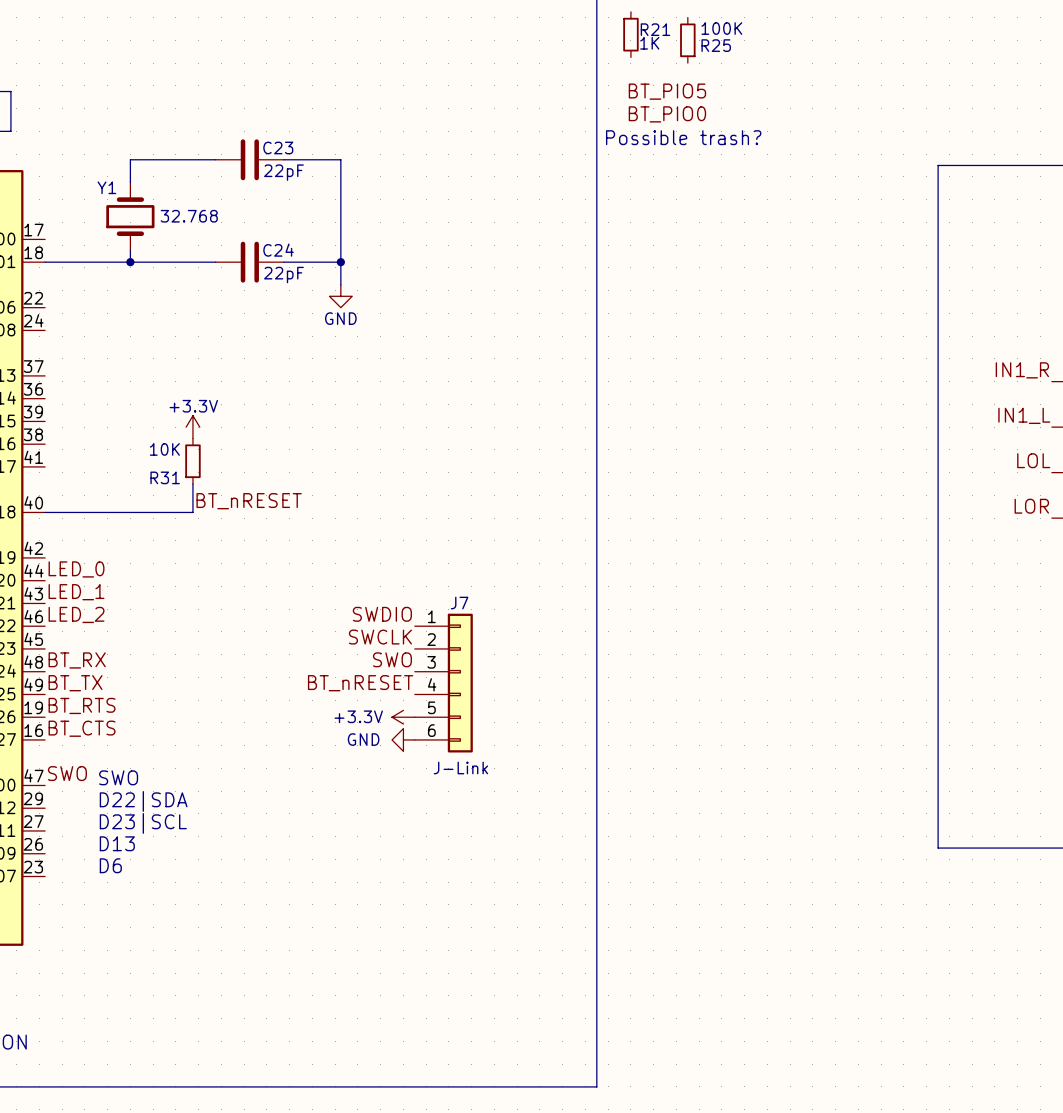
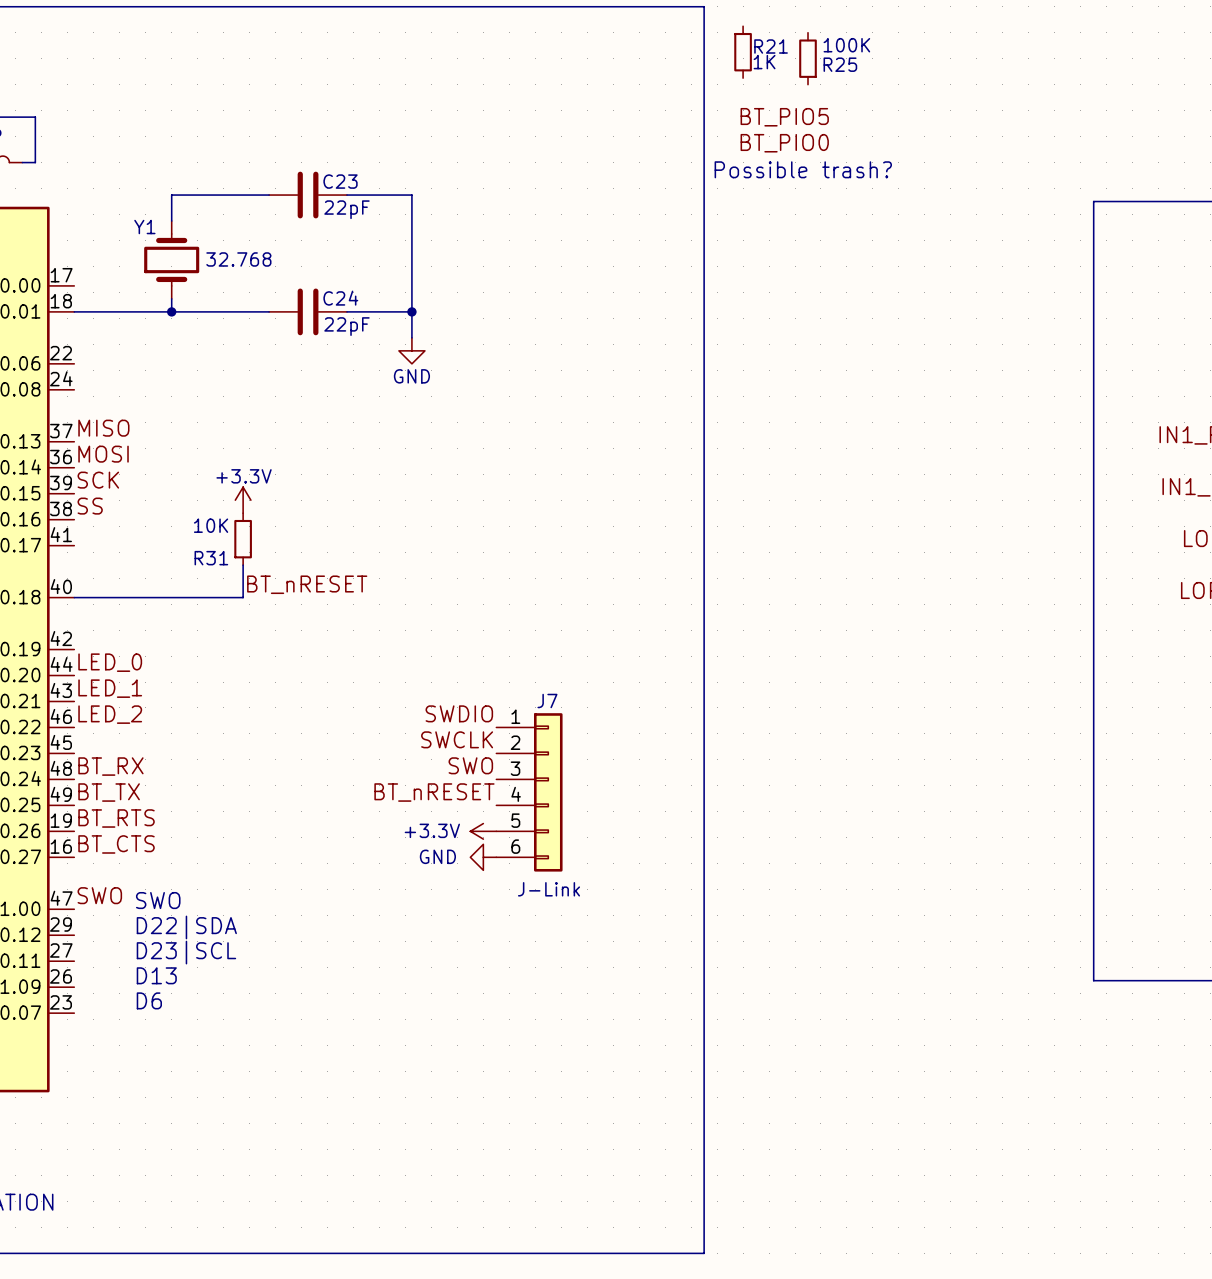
label: none -> MISO (103, 428)
label: none -> MOSI (103, 454)
label: none -> SCK (98, 480)
label: none -> SS (90, 506)

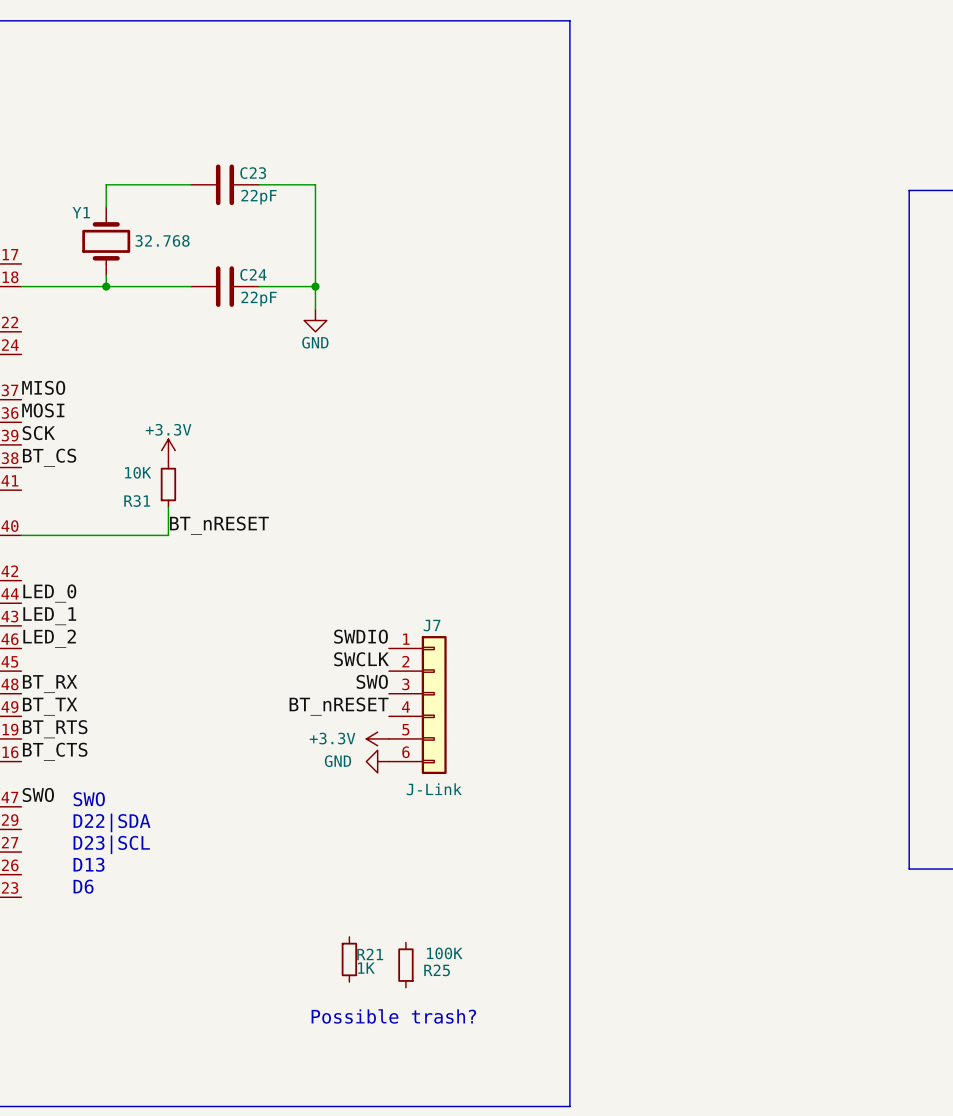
R21 position: (743, 52) -> (349, 959)
R25 position: (808, 58) -> (405, 965)
label: BT_PIO5 (784, 117) -> none
label: BT_PIO0 (784, 143) -> none
text: Possible trash? (803, 169) -> none
label: SS (90, 506) -> BT_CS (49, 457)
text: none -> Possible trash? (393, 1016)

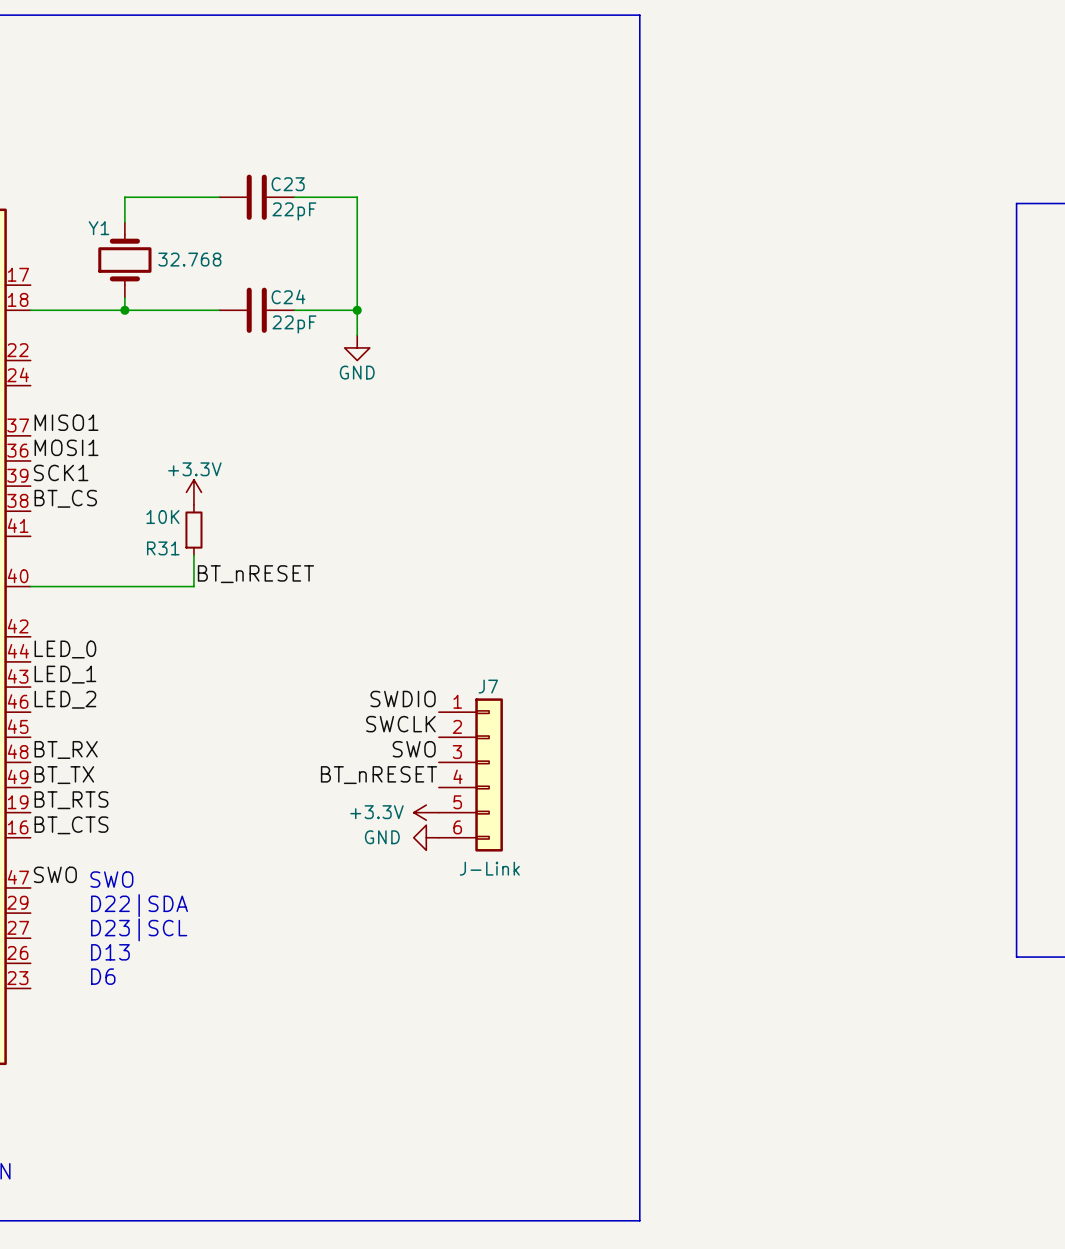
label: MISO (43, 387) -> MISO1 (66, 422)
label: MOSI (43, 410) -> MOSI1 (66, 447)
label: SCK (38, 433) -> SCK1 (61, 472)
R21: 1K (349, 959) -> none
R25: 100K (405, 965) -> none
text: Possible trash? (393, 1016) -> none

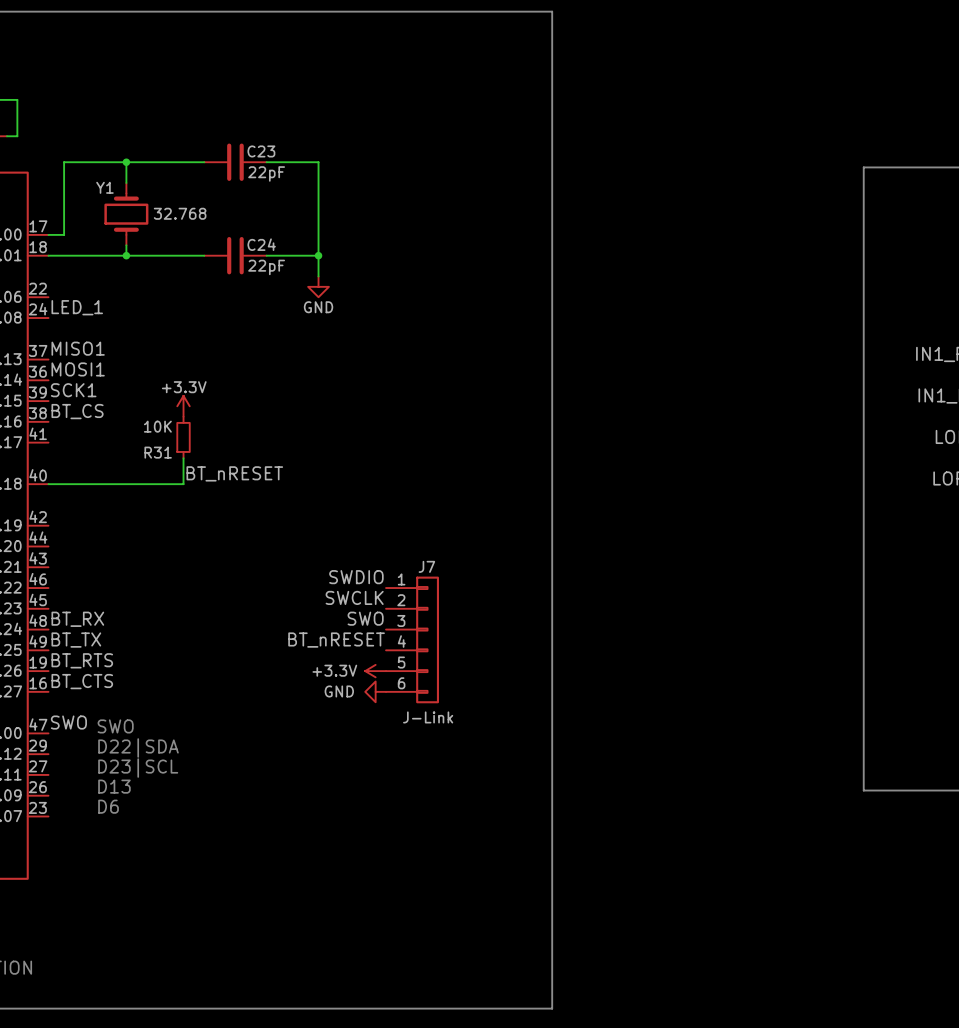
wire: none -> (126, 162) (64, 162) (64, 234) (48, 234)
junction: none -> (126, 162)
label: none -> LED_1 (77, 307)
label: LED_0 (65, 649) -> none
label: LED_1 (65, 674) -> none
label: LED_2 (65, 699) -> none

